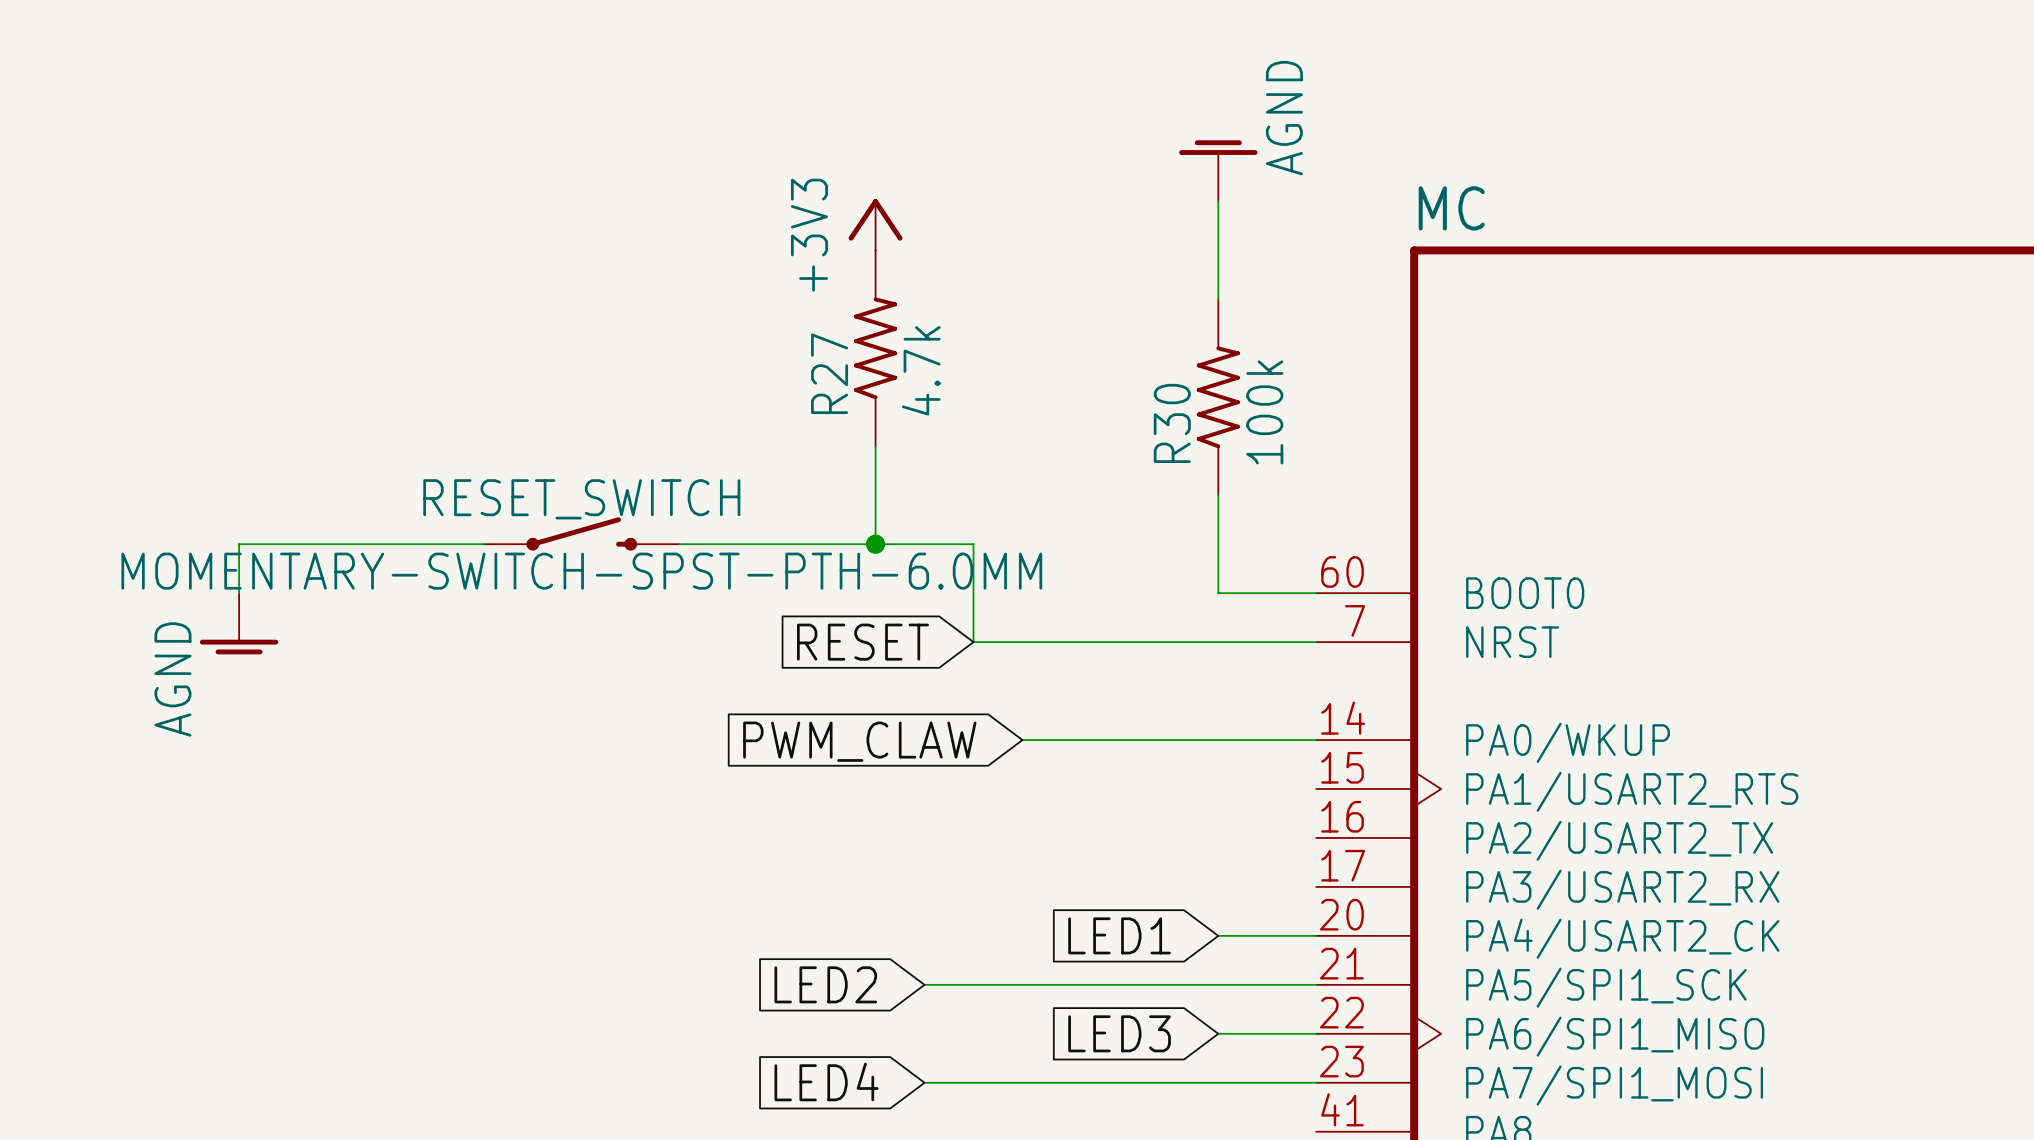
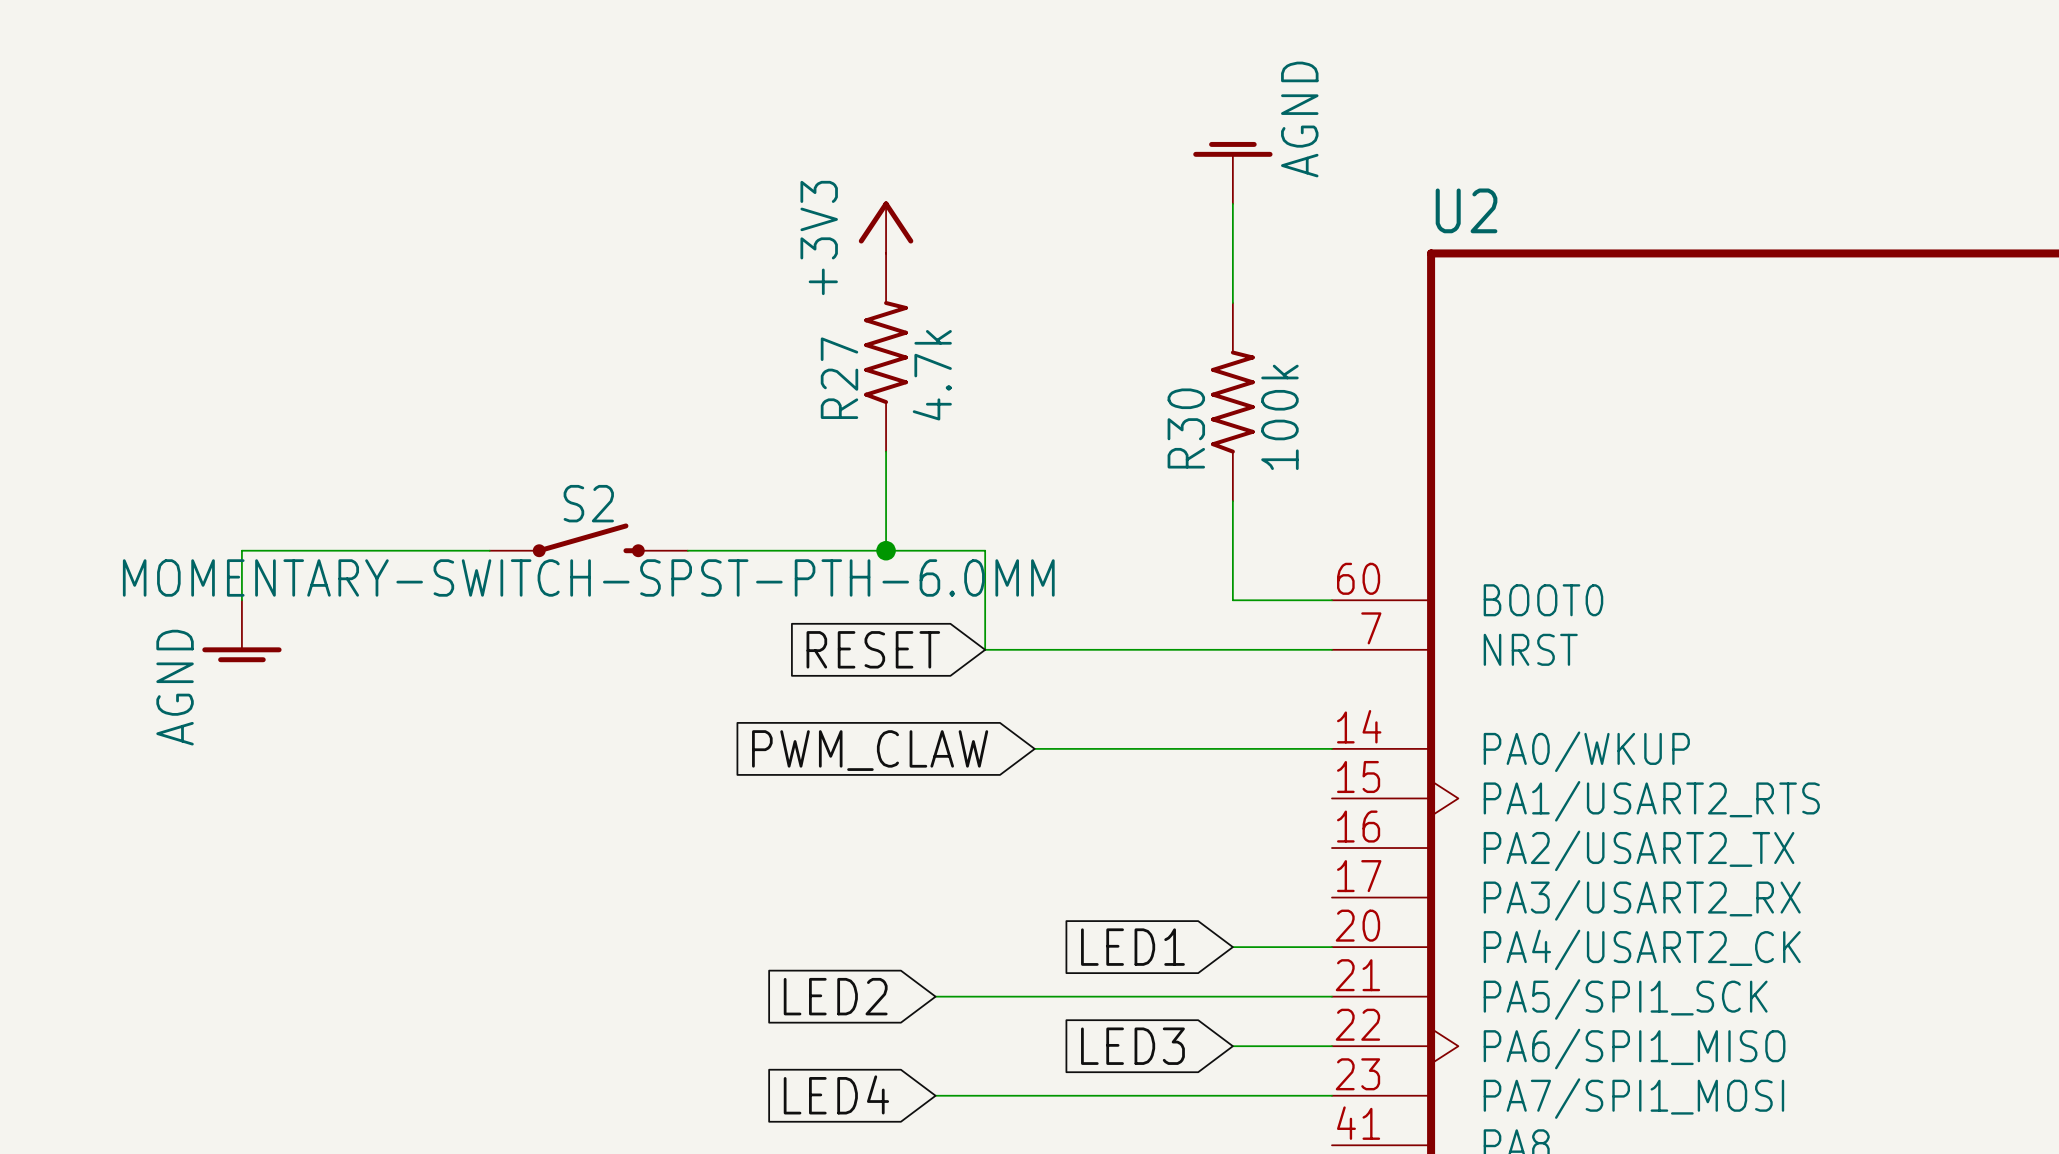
MC name: MC (1451, 208) -> U2 (1466, 210)
RESET_SWITCH name: RESET_SWITCH (581, 499) -> S2 (588, 503)

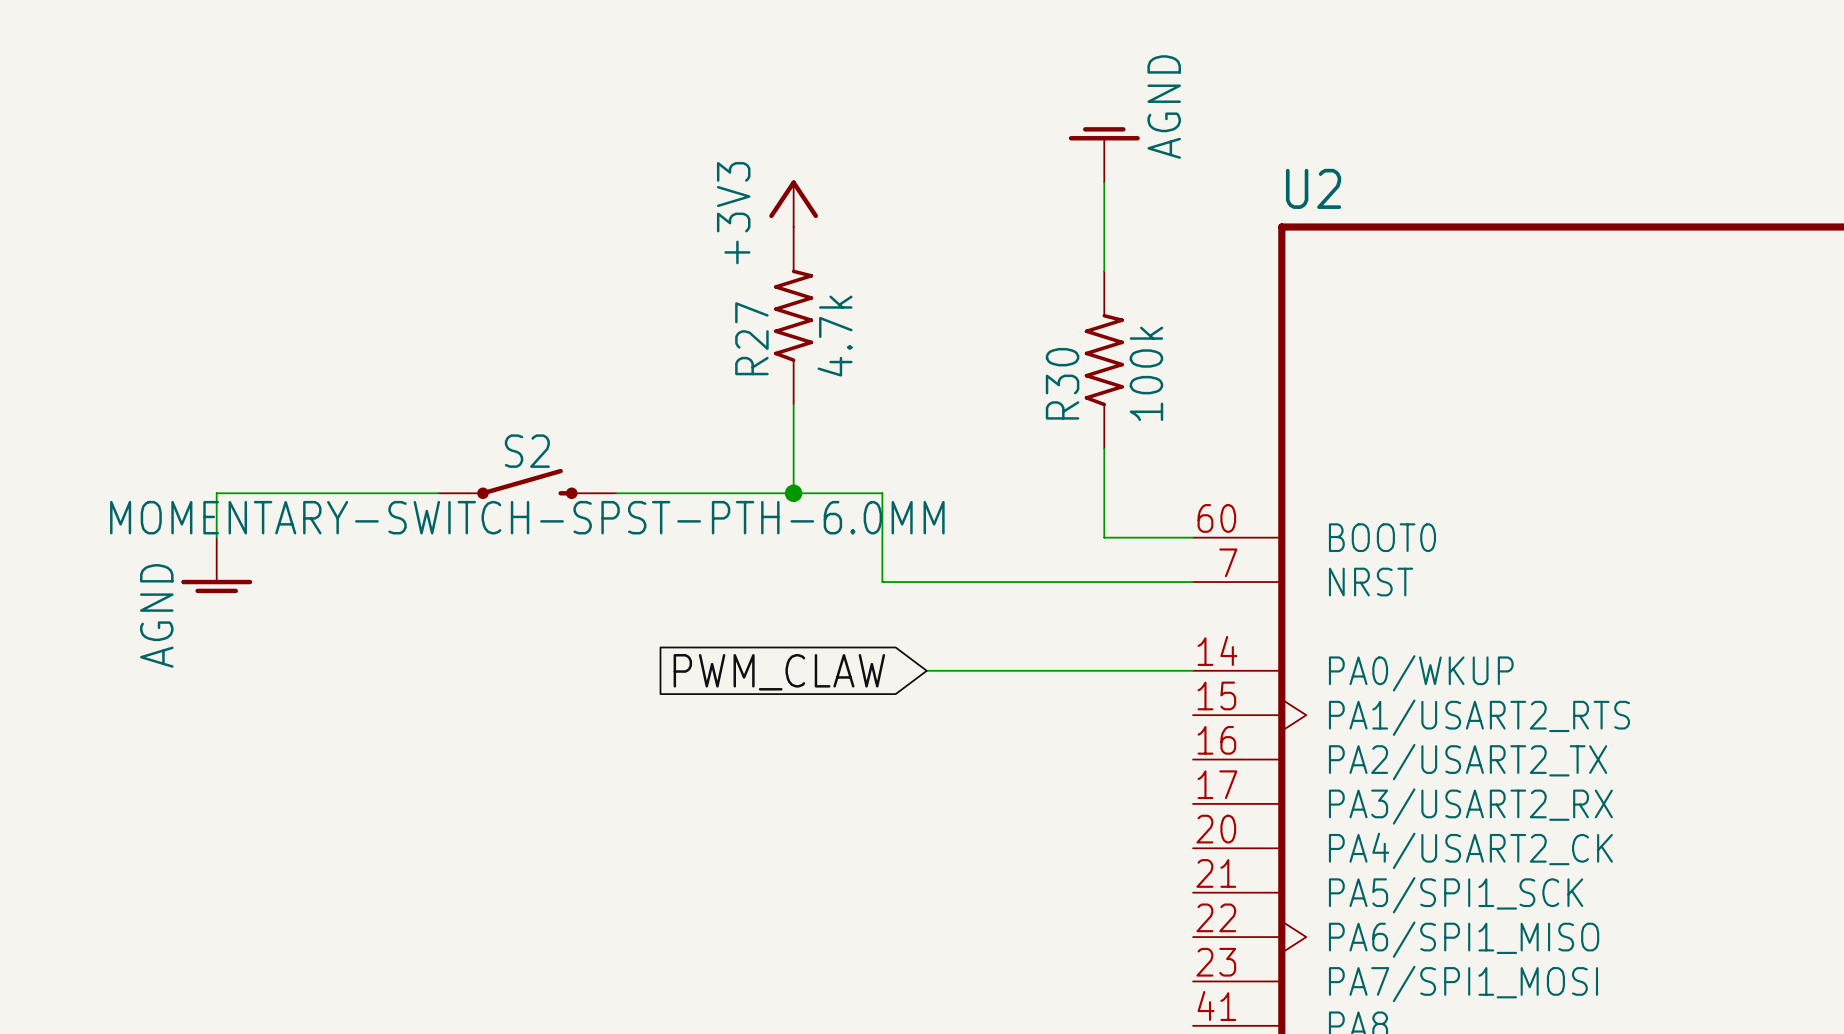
global label: RESET (873, 649) -> none
global label: LED1 (1132, 947) -> none
wire: (1232, 947) (1331, 947) -> none
global label: LED2 (835, 996) -> none
wire: (935, 996) (1331, 996) -> none
global label: LED3 (1132, 1046) -> none
wire: (1232, 1046) (1331, 1046) -> none
global label: LED4 (836, 1094) -> none
wire: (935, 1095) (1331, 1095) -> none

